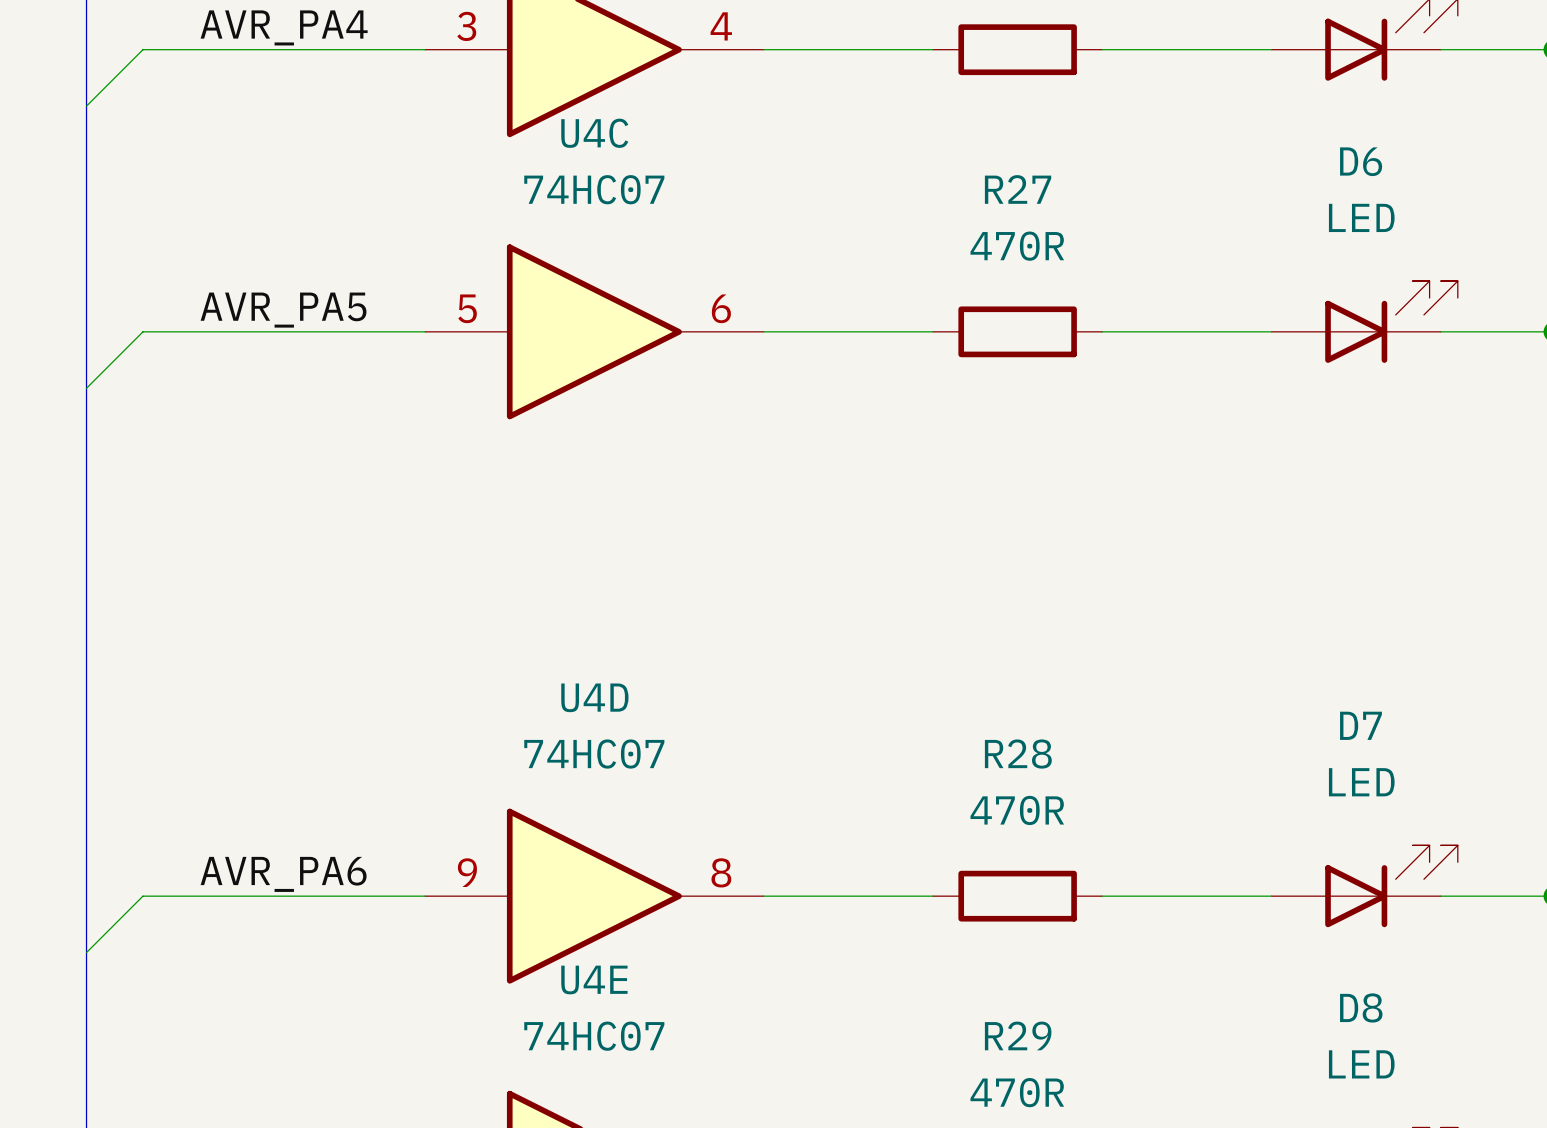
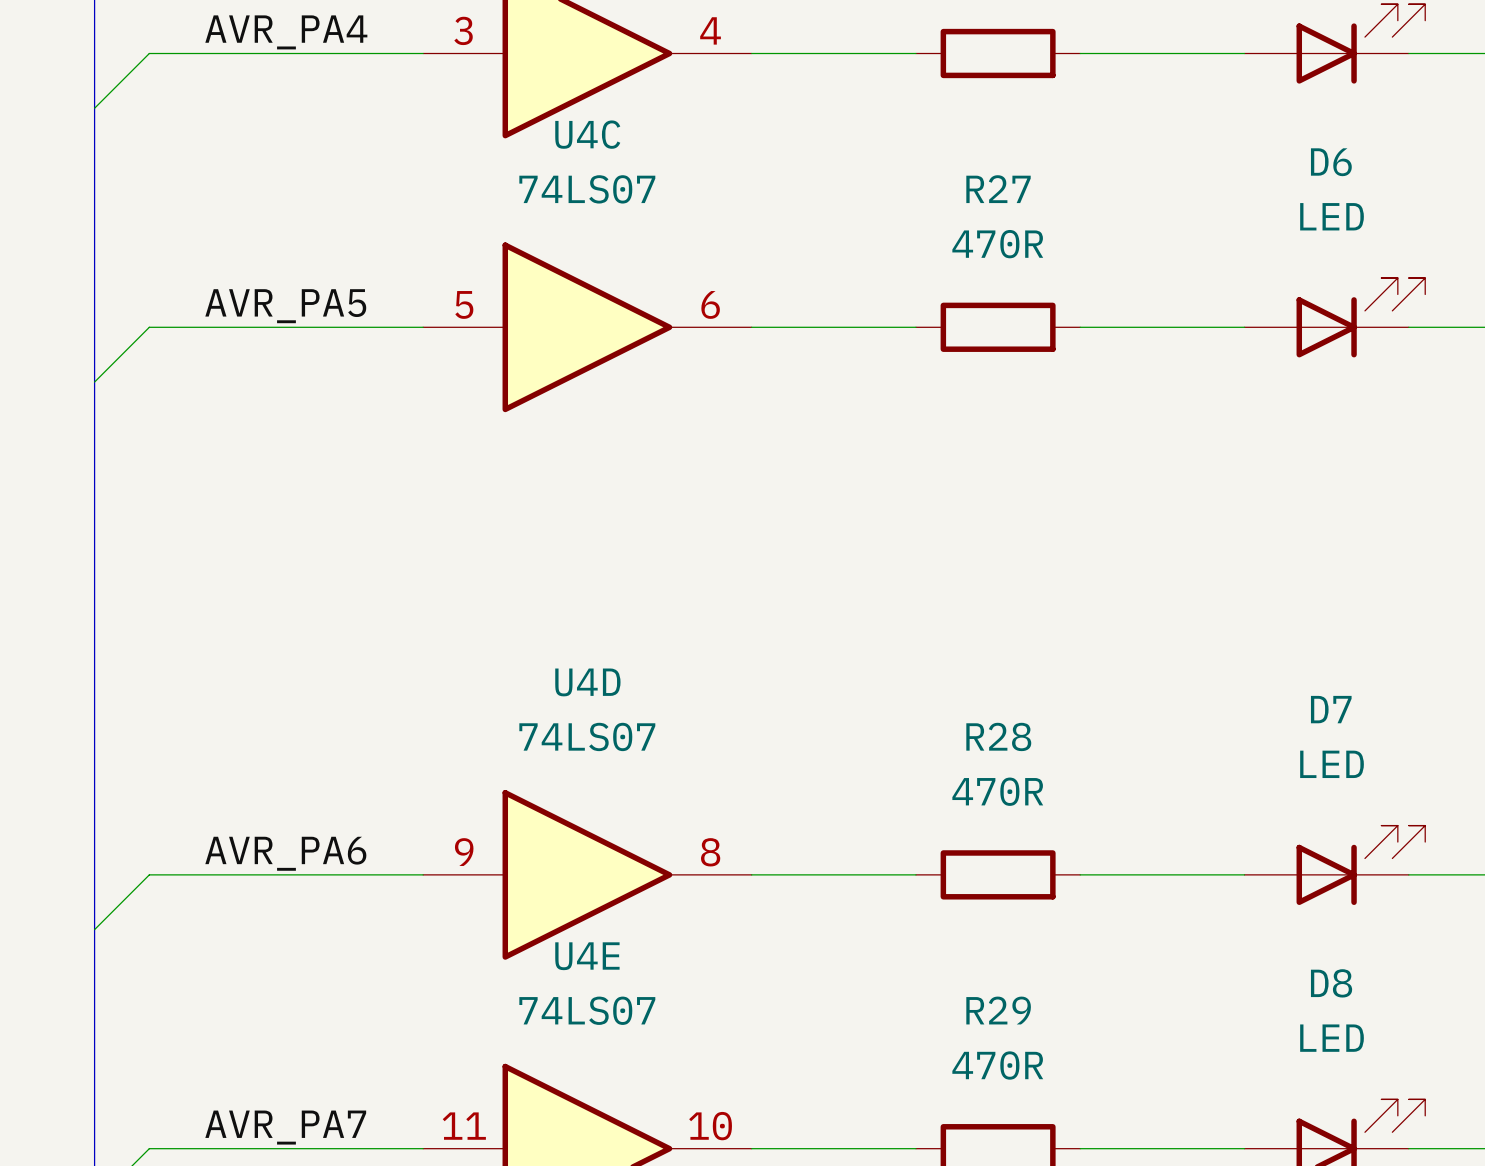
U4C value: 74HC07 (594, 189) -> 74LS07 (587, 189)
U4D value: 74HC07 (594, 754) -> 74LS07 (587, 736)
U4E value: 74HC07 (594, 1036) -> 74LS07 (587, 1010)

